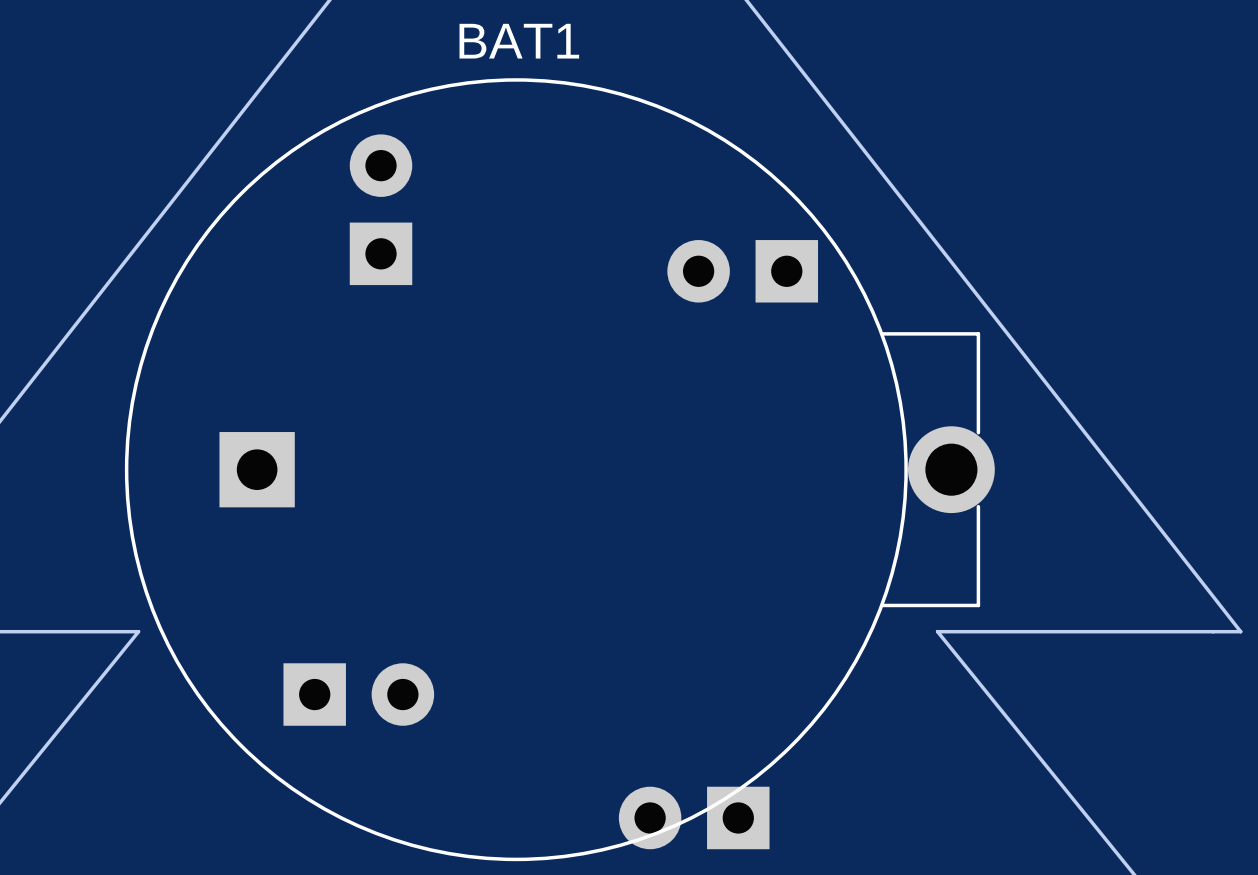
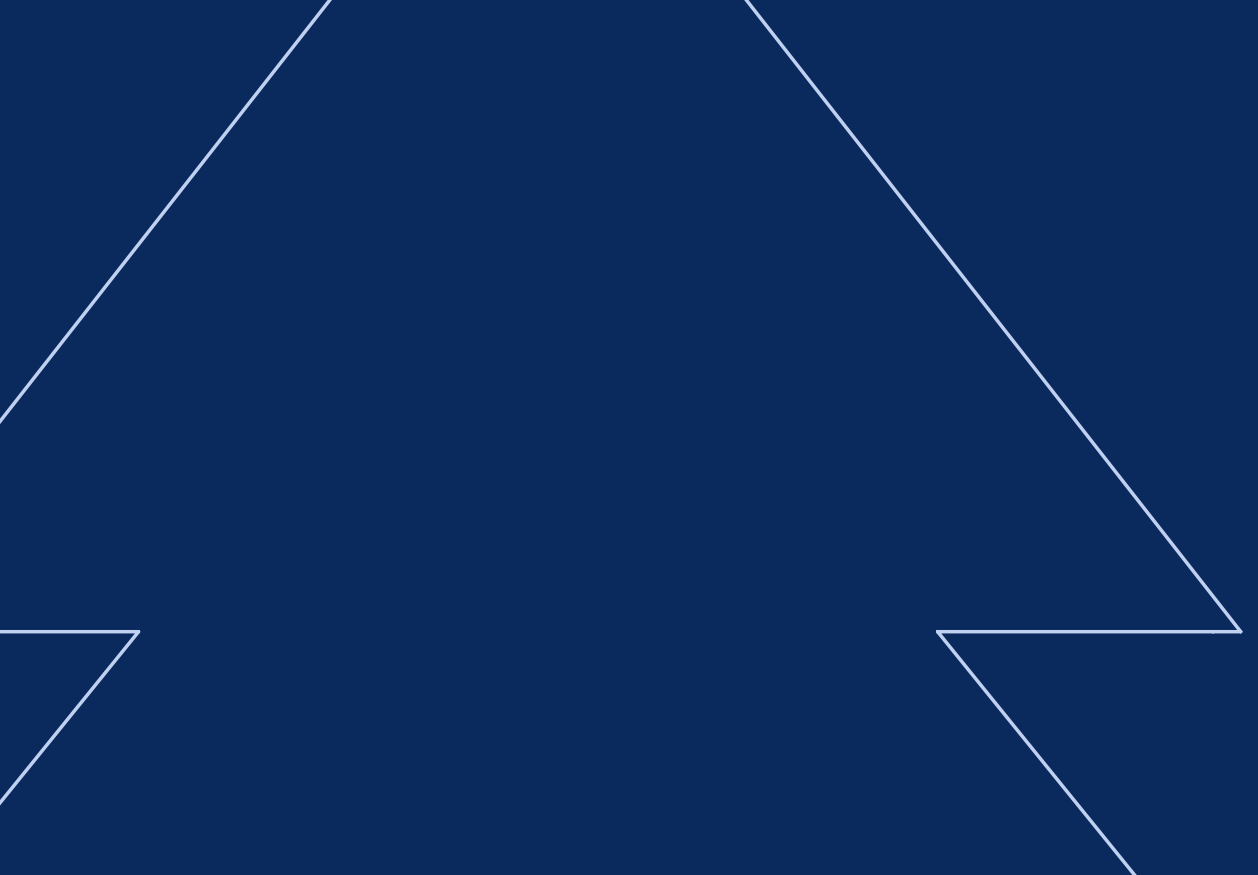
part: (381, 209) -> none
part: (742, 271) -> none
BAT1: (559, 469) -> none
part: (358, 694) -> none
part: (694, 817) -> none

